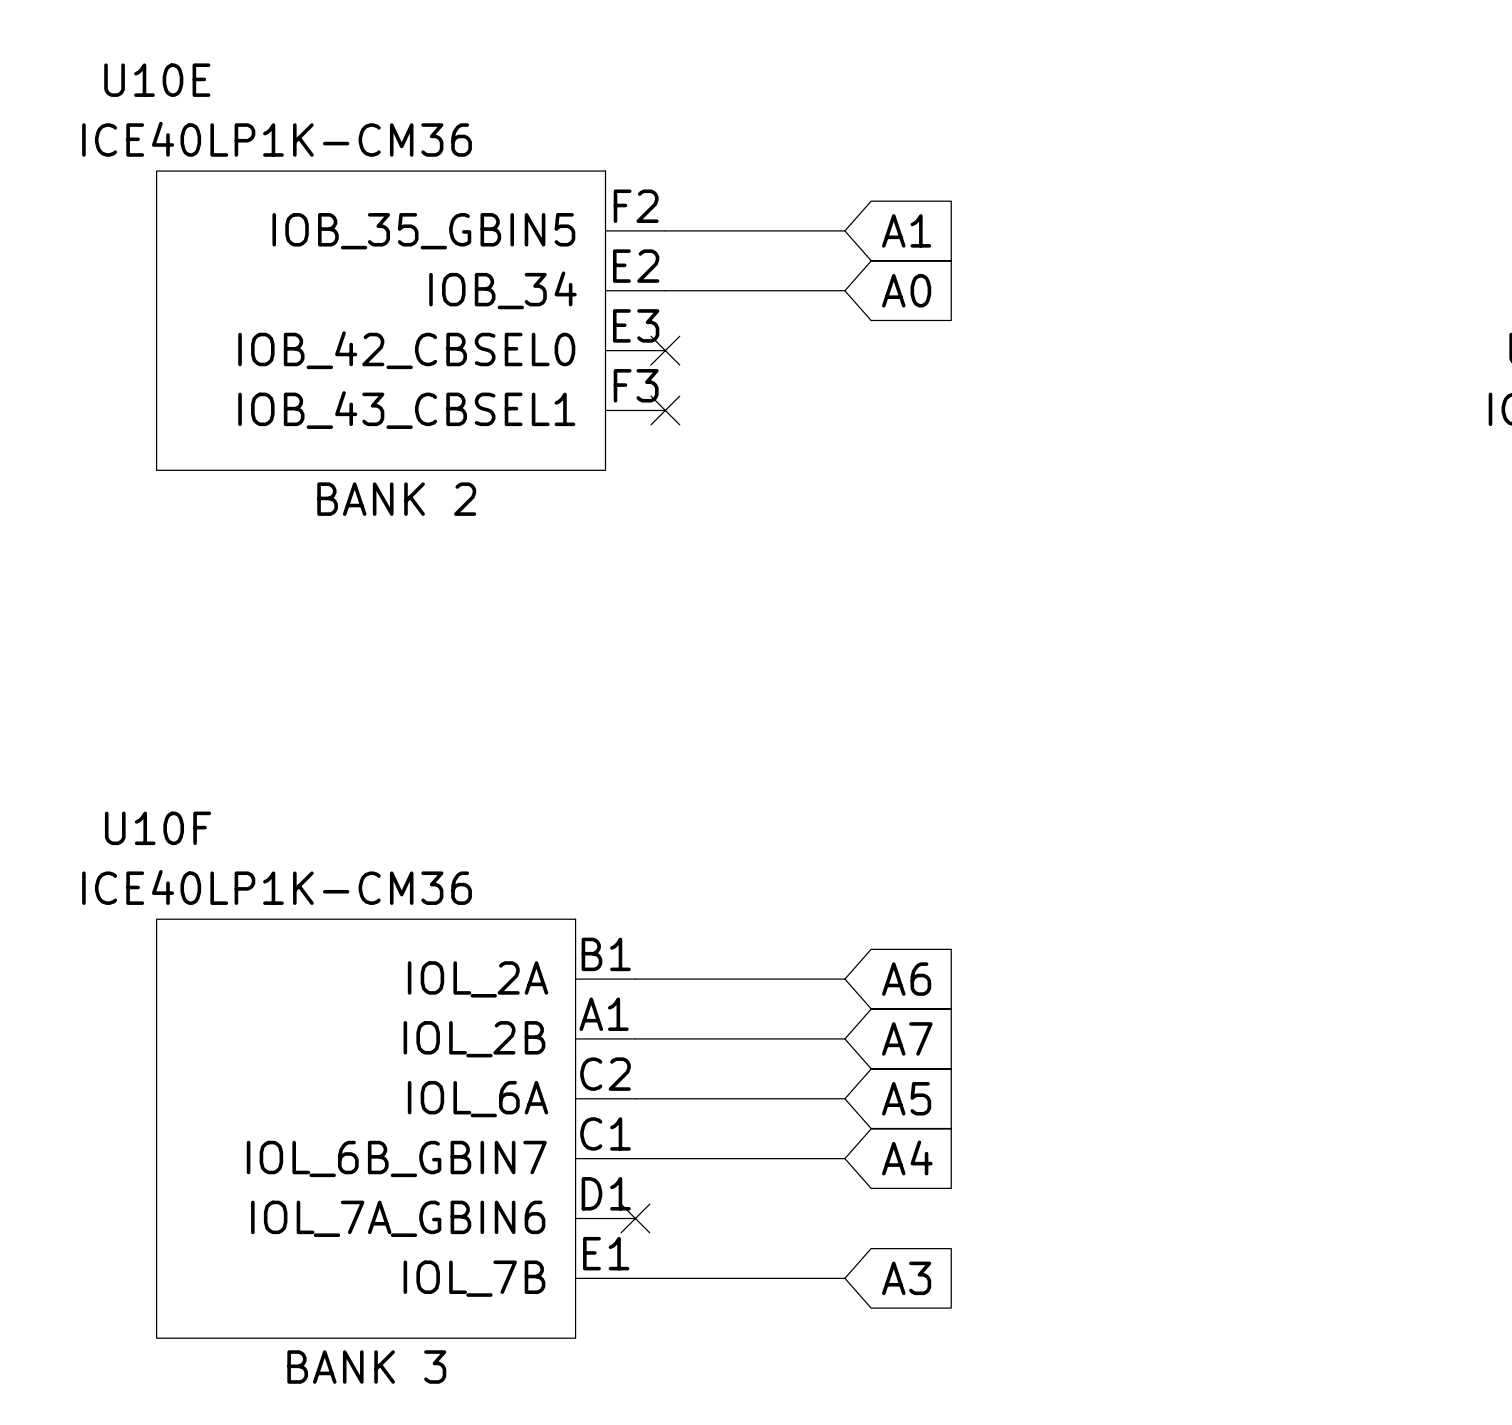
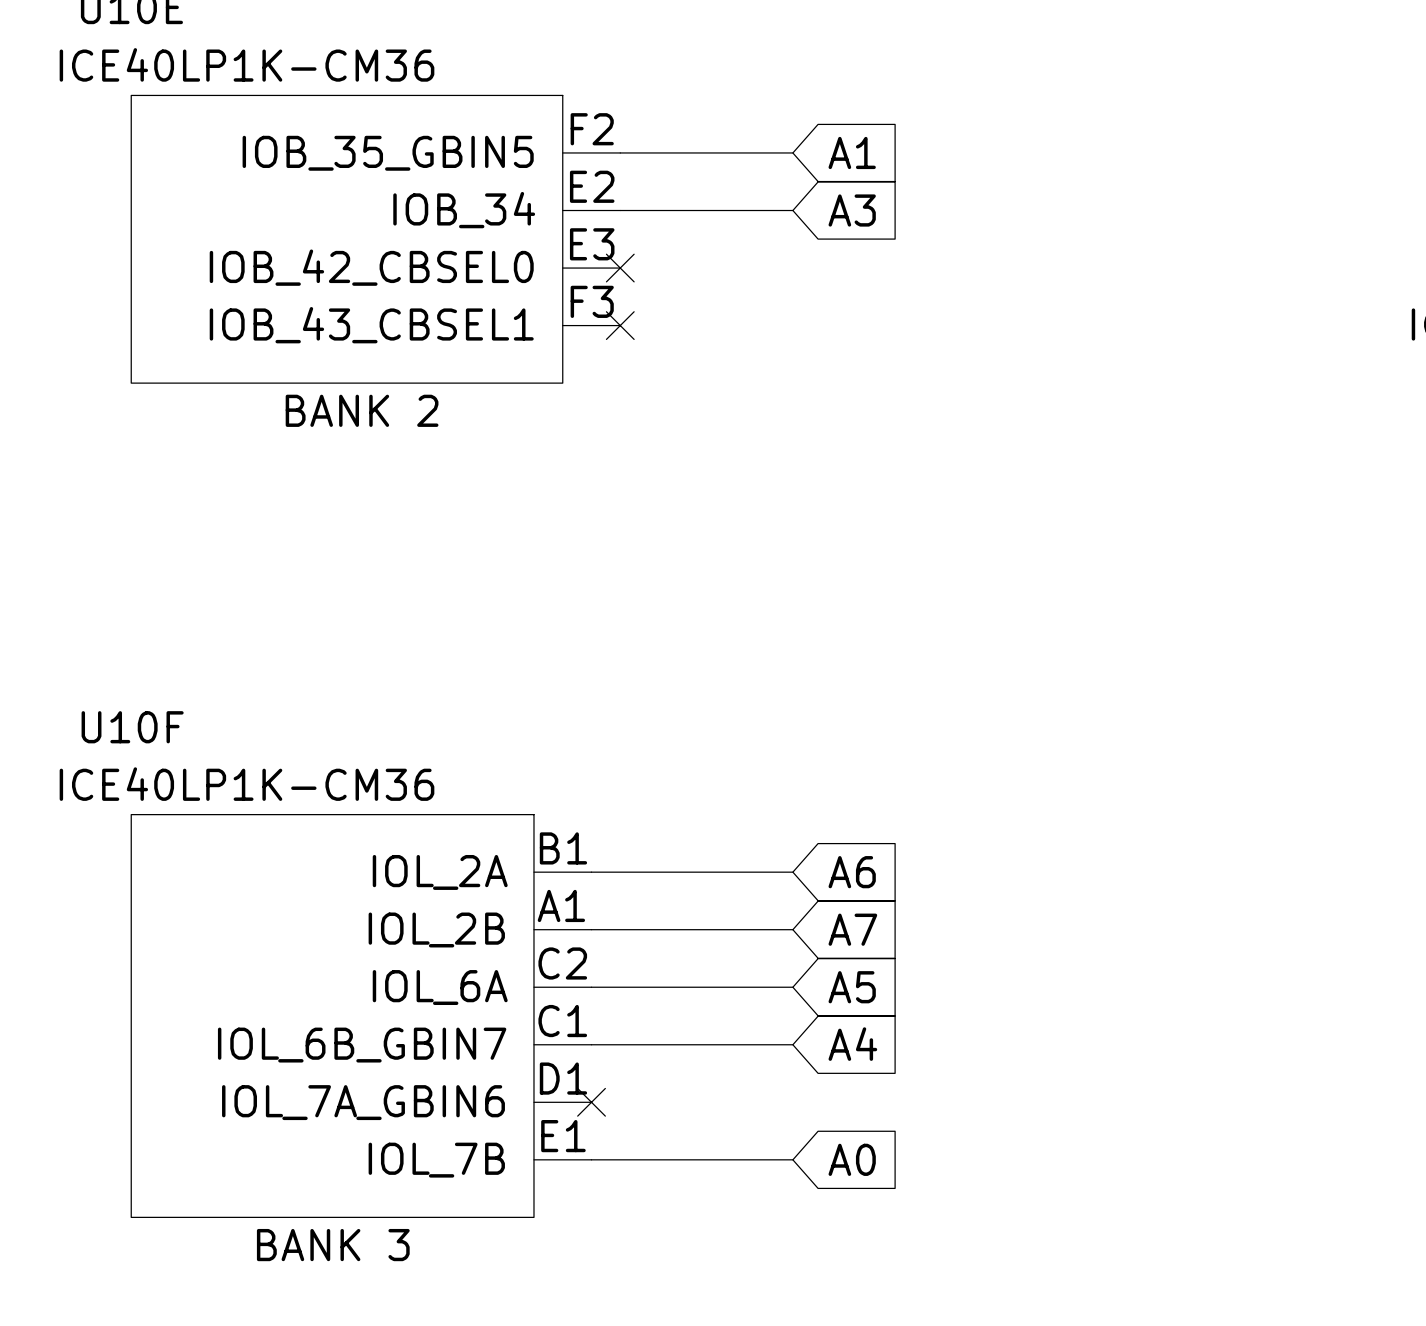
global label: A0 (906, 290) -> A3 (852, 210)
global label: A3 (906, 1278) -> A0 (852, 1159)

